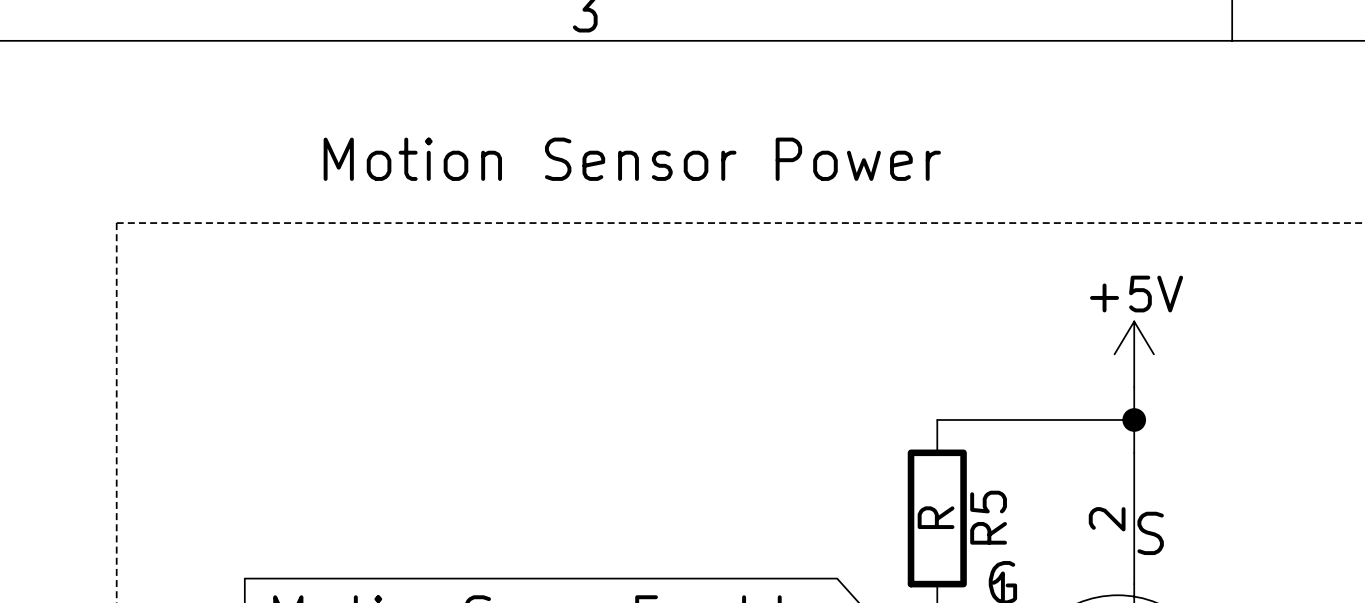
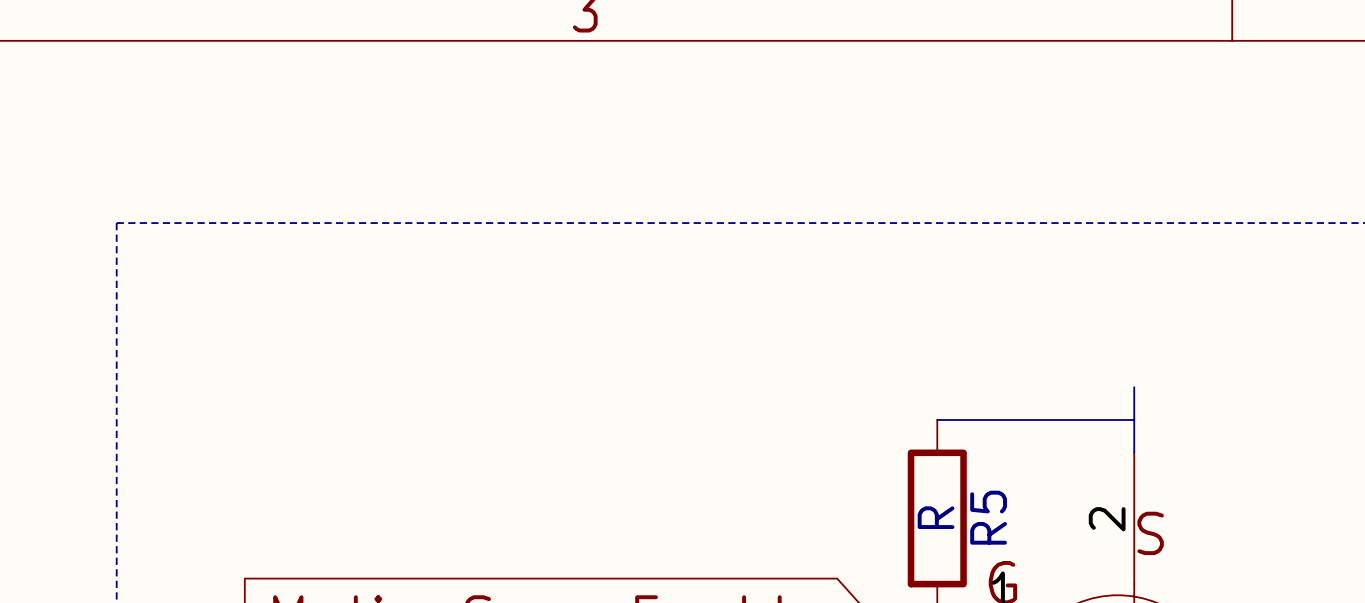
text: Motion Sensor Power (632, 159) -> none
power symbol: +5V (1134, 354) -> none
junction: (1134, 419) -> none

